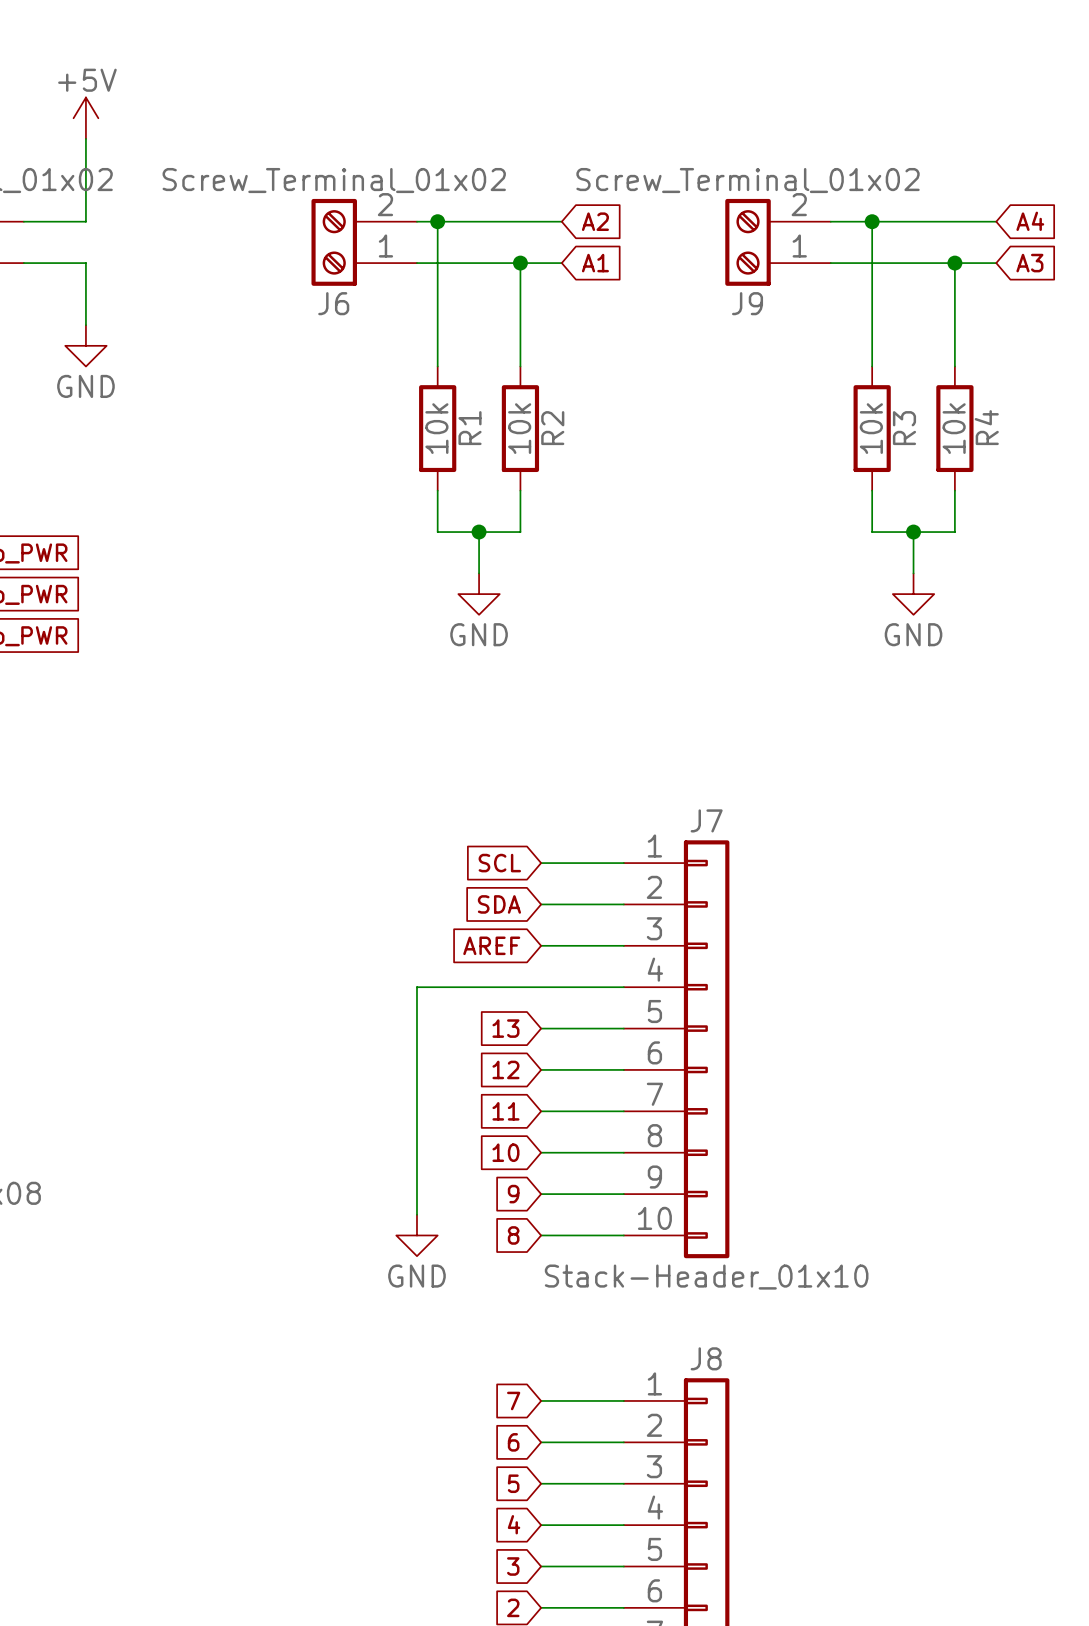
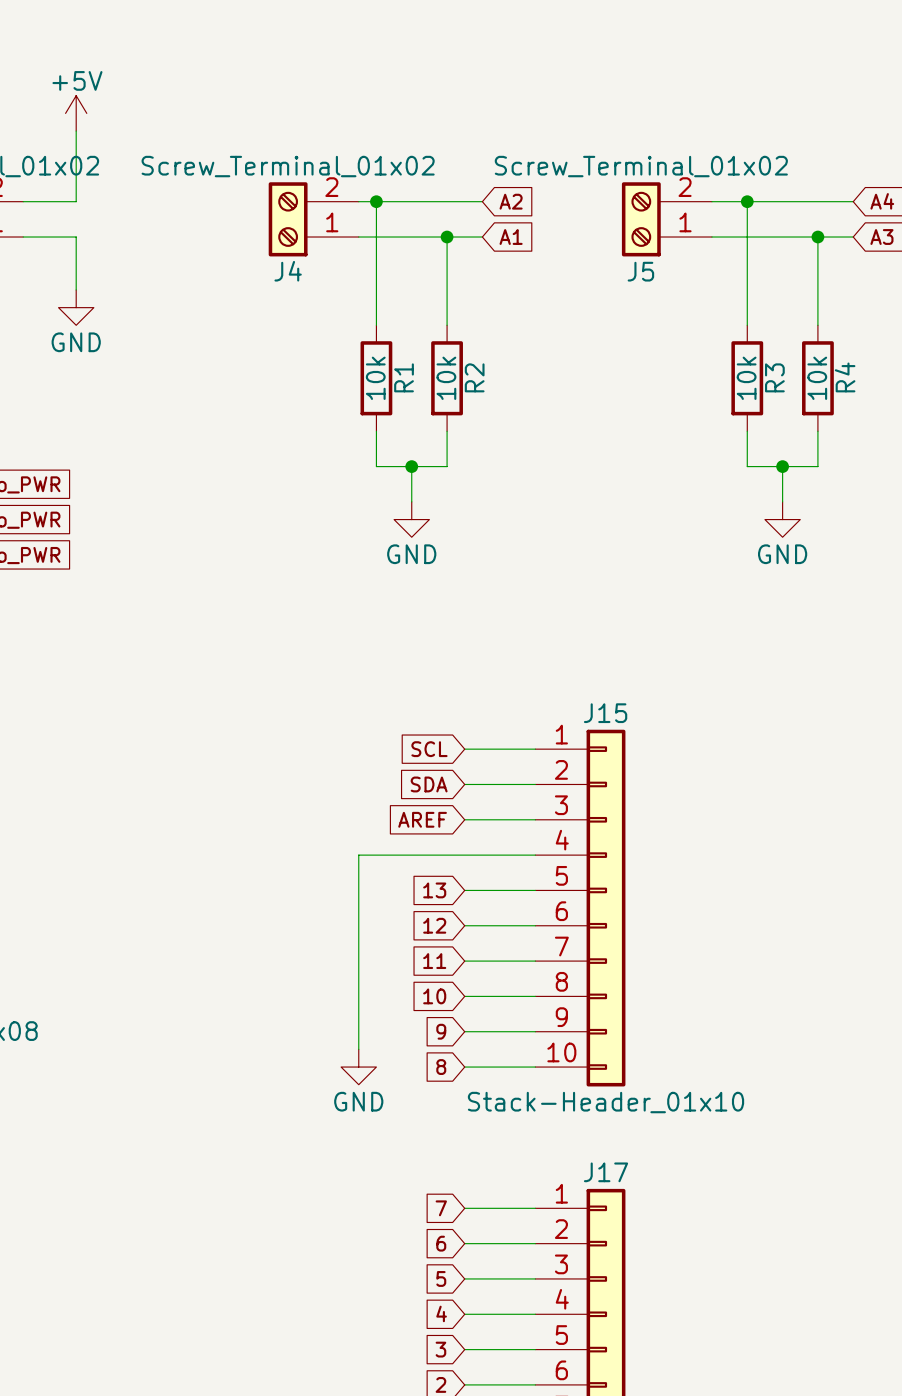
J6 name: J6 (333, 303) -> J4 (288, 271)
J9 name: J9 (747, 303) -> J5 (640, 271)
J7 name: J7 (706, 820) -> J15 (605, 713)
J8 name: J8 (706, 1358) -> J17 (606, 1172)

